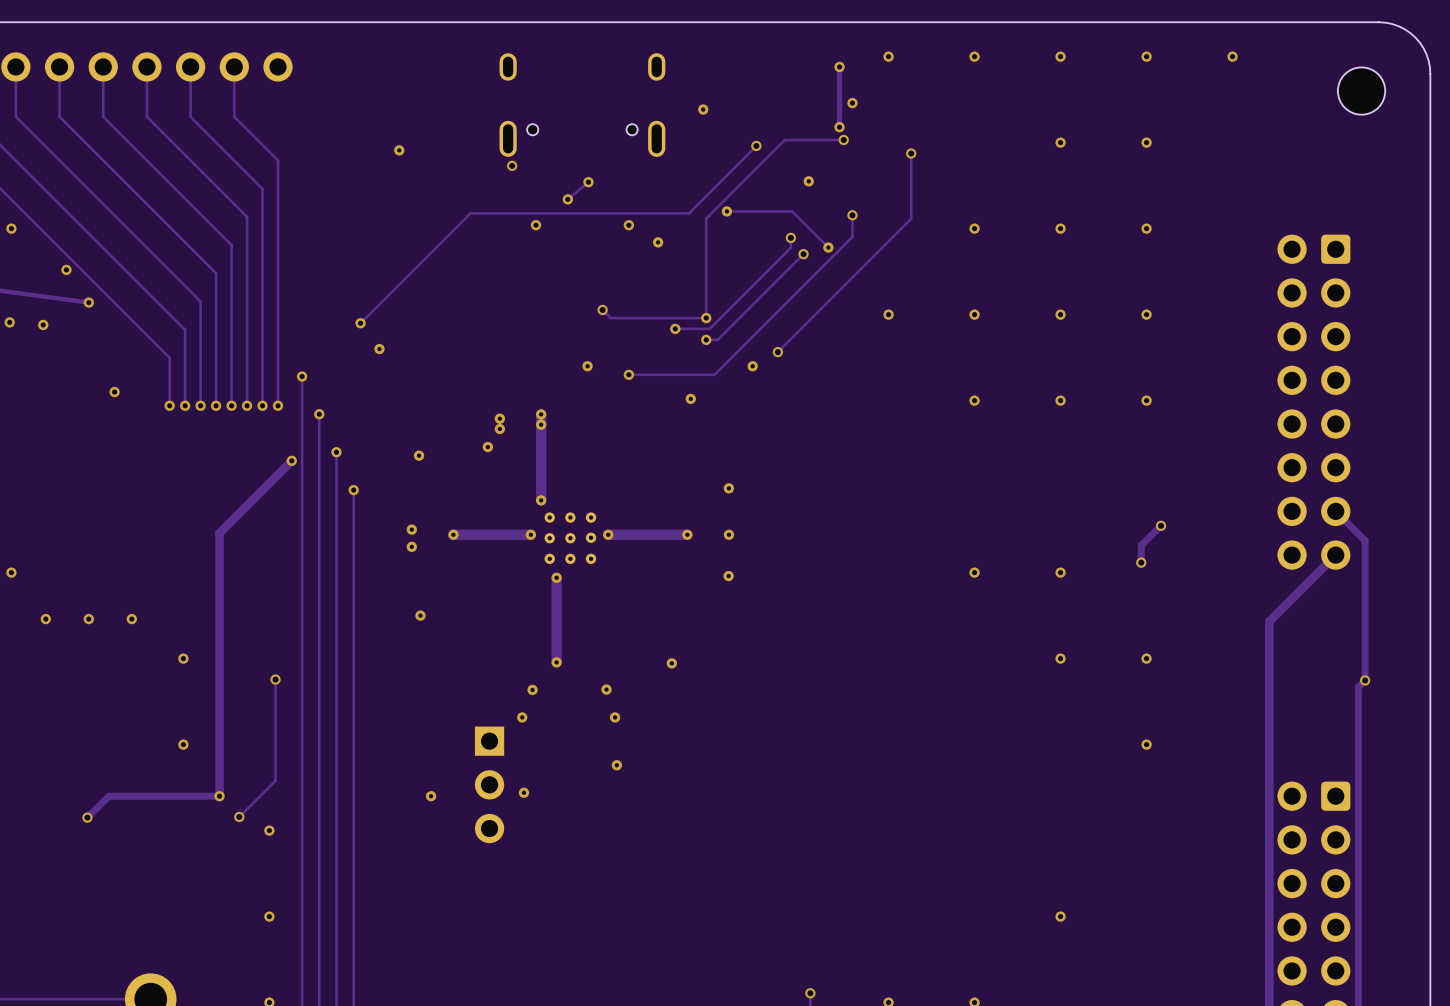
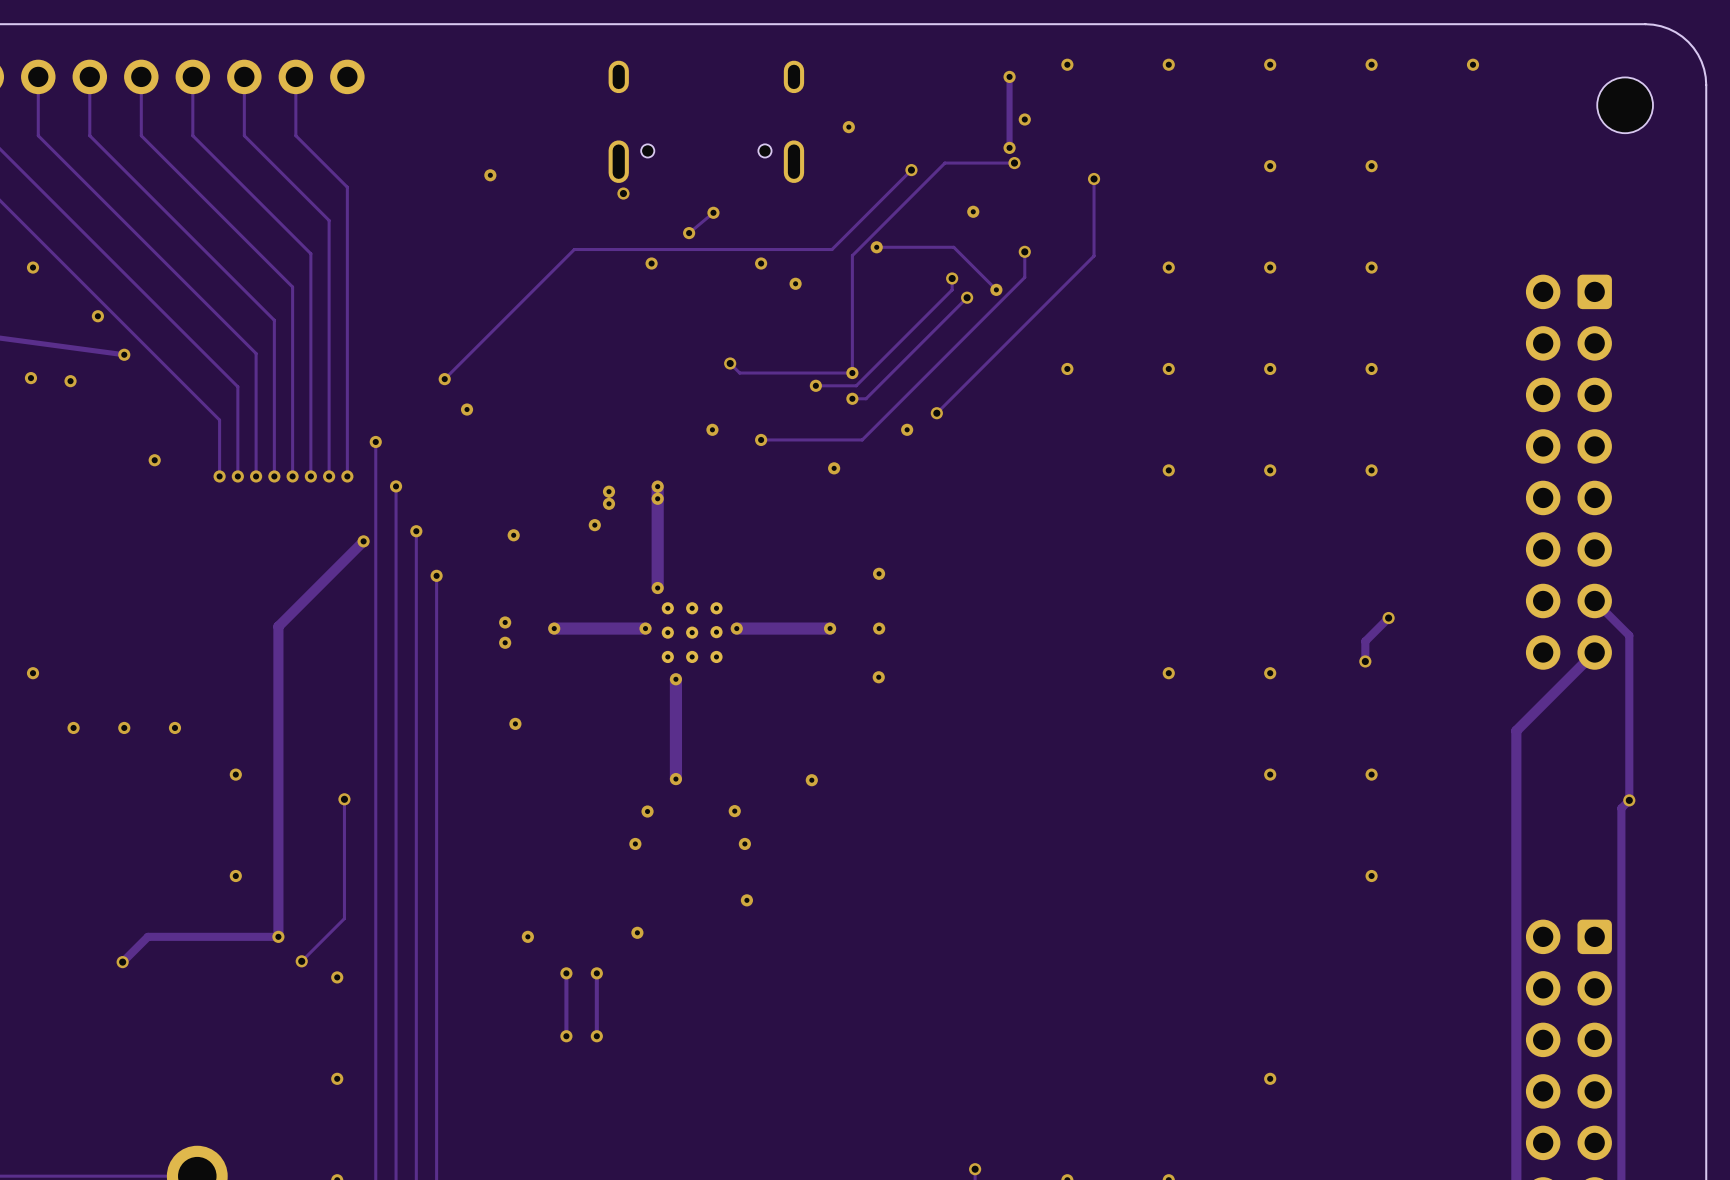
part: (489, 784) -> none
track: none -> (566, 973) (566, 1036)
via: none -> (566, 973)
track: none -> (596, 973) (596, 1036)
via: none -> (596, 973)
via: none -> (566, 1036)
via: none -> (596, 1036)

